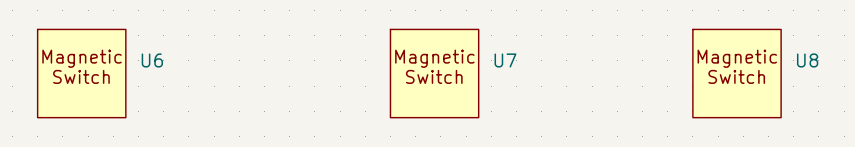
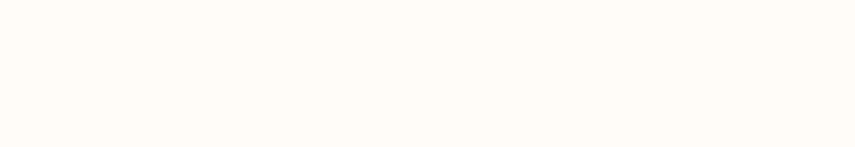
U6: (81, 73) -> none
U7: (434, 73) -> none
U8: (737, 73) -> none

